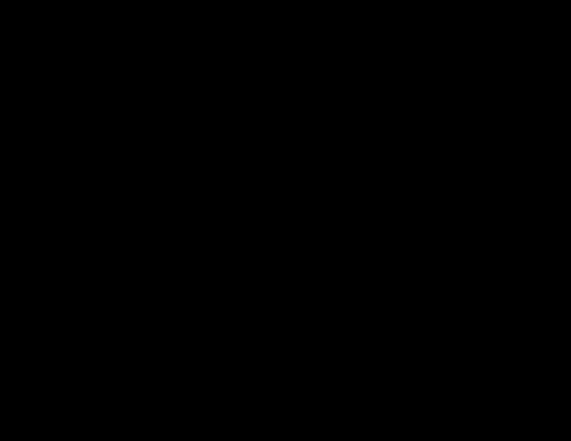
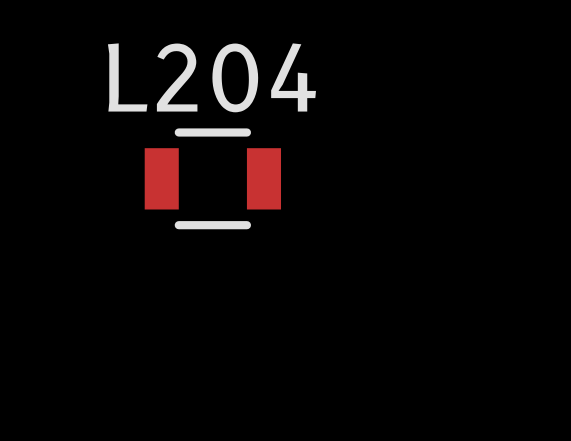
L204: none -> (212, 178)

